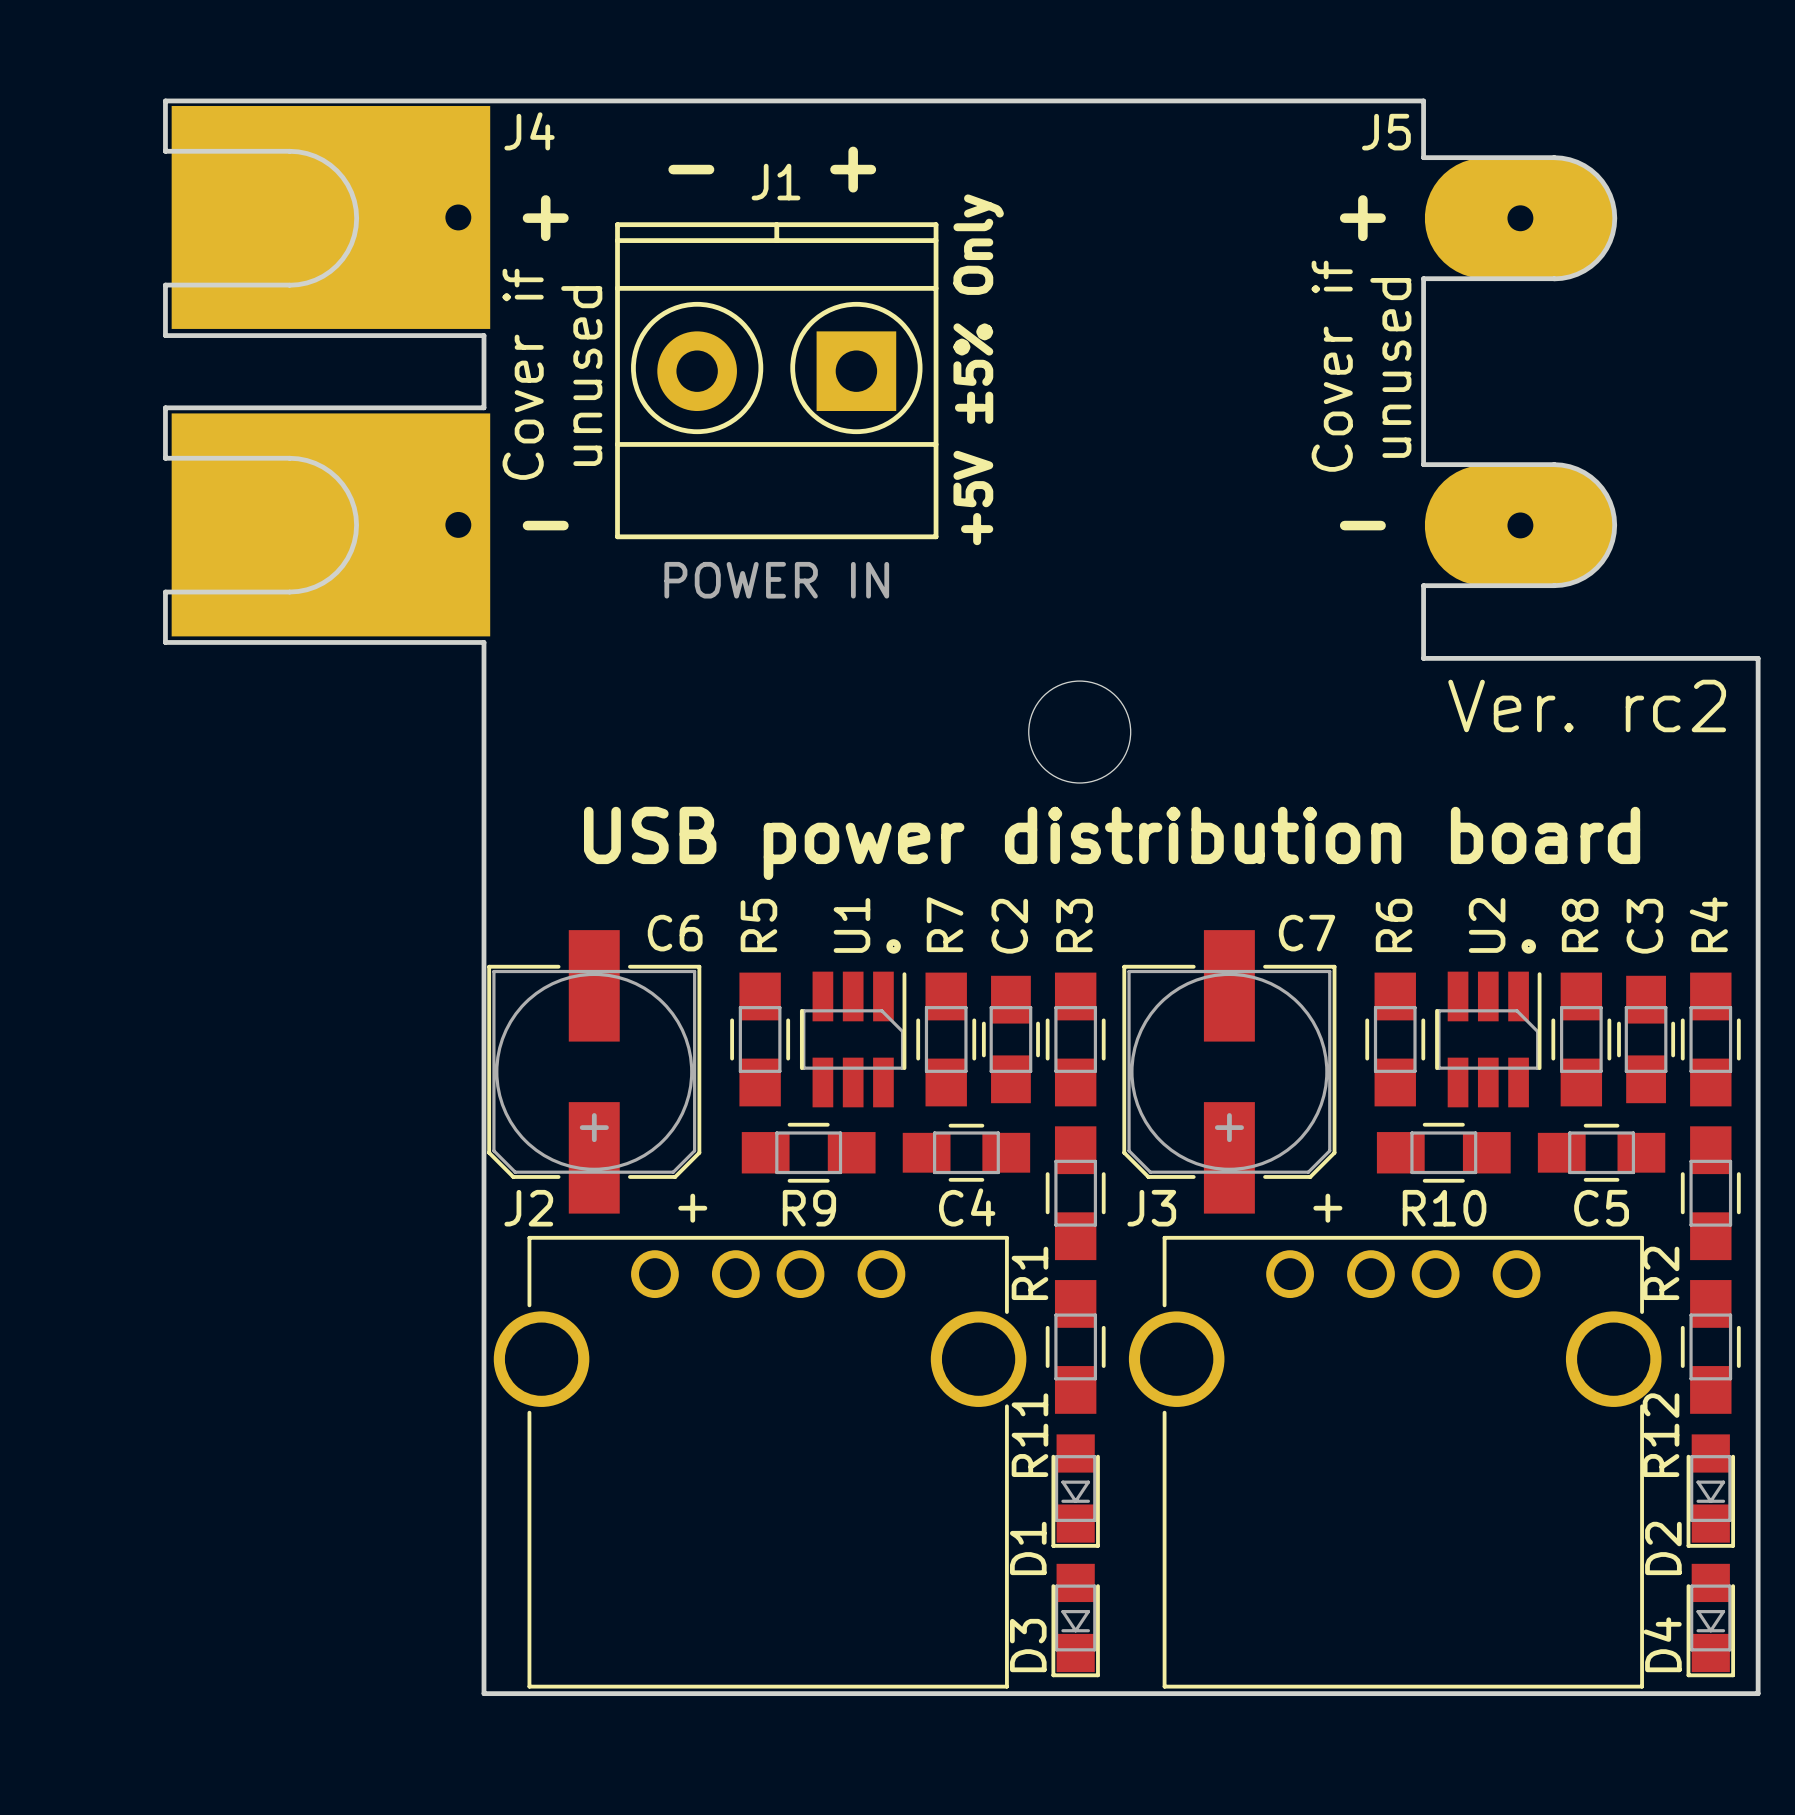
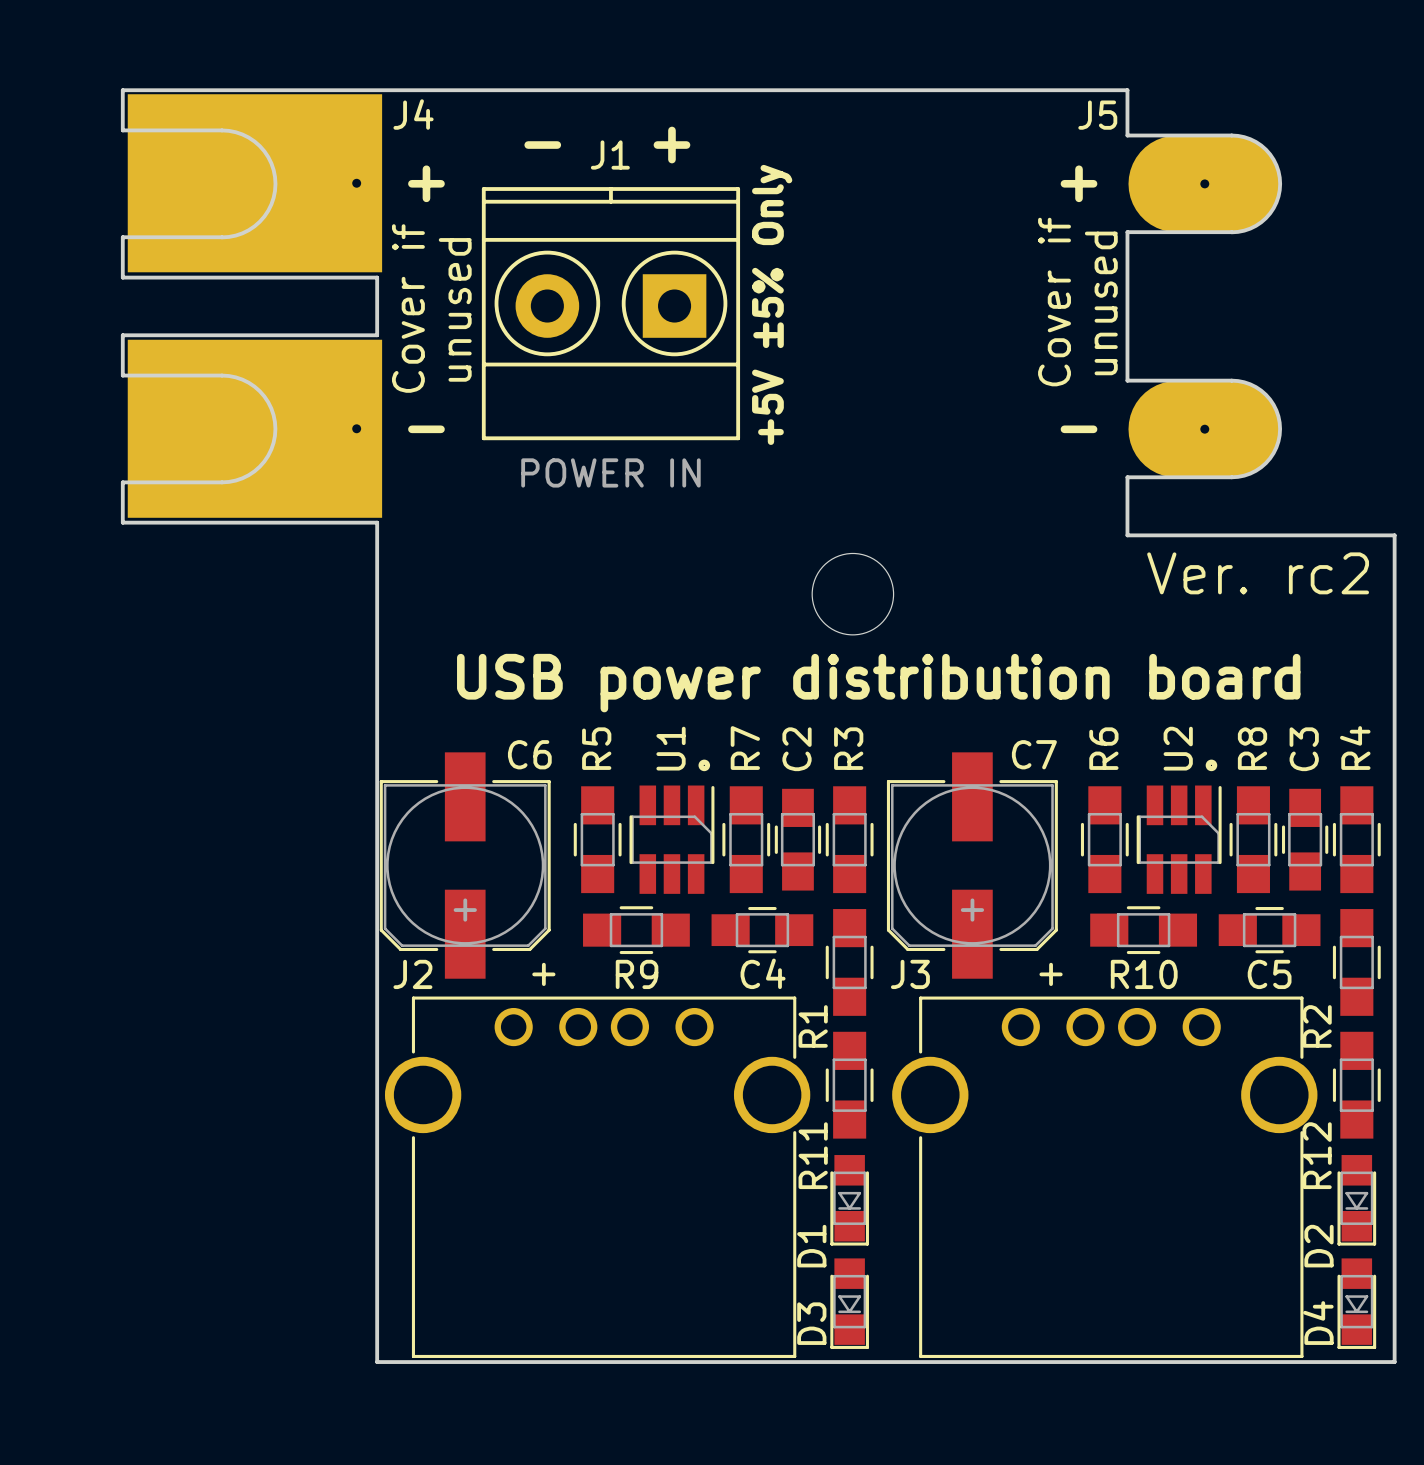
J4 footprint: [171, 105, 491, 637] -> [127, 94, 383, 518]
J5 footprint: [1424, 157, 1616, 586] -> [1128, 135, 1282, 478]

